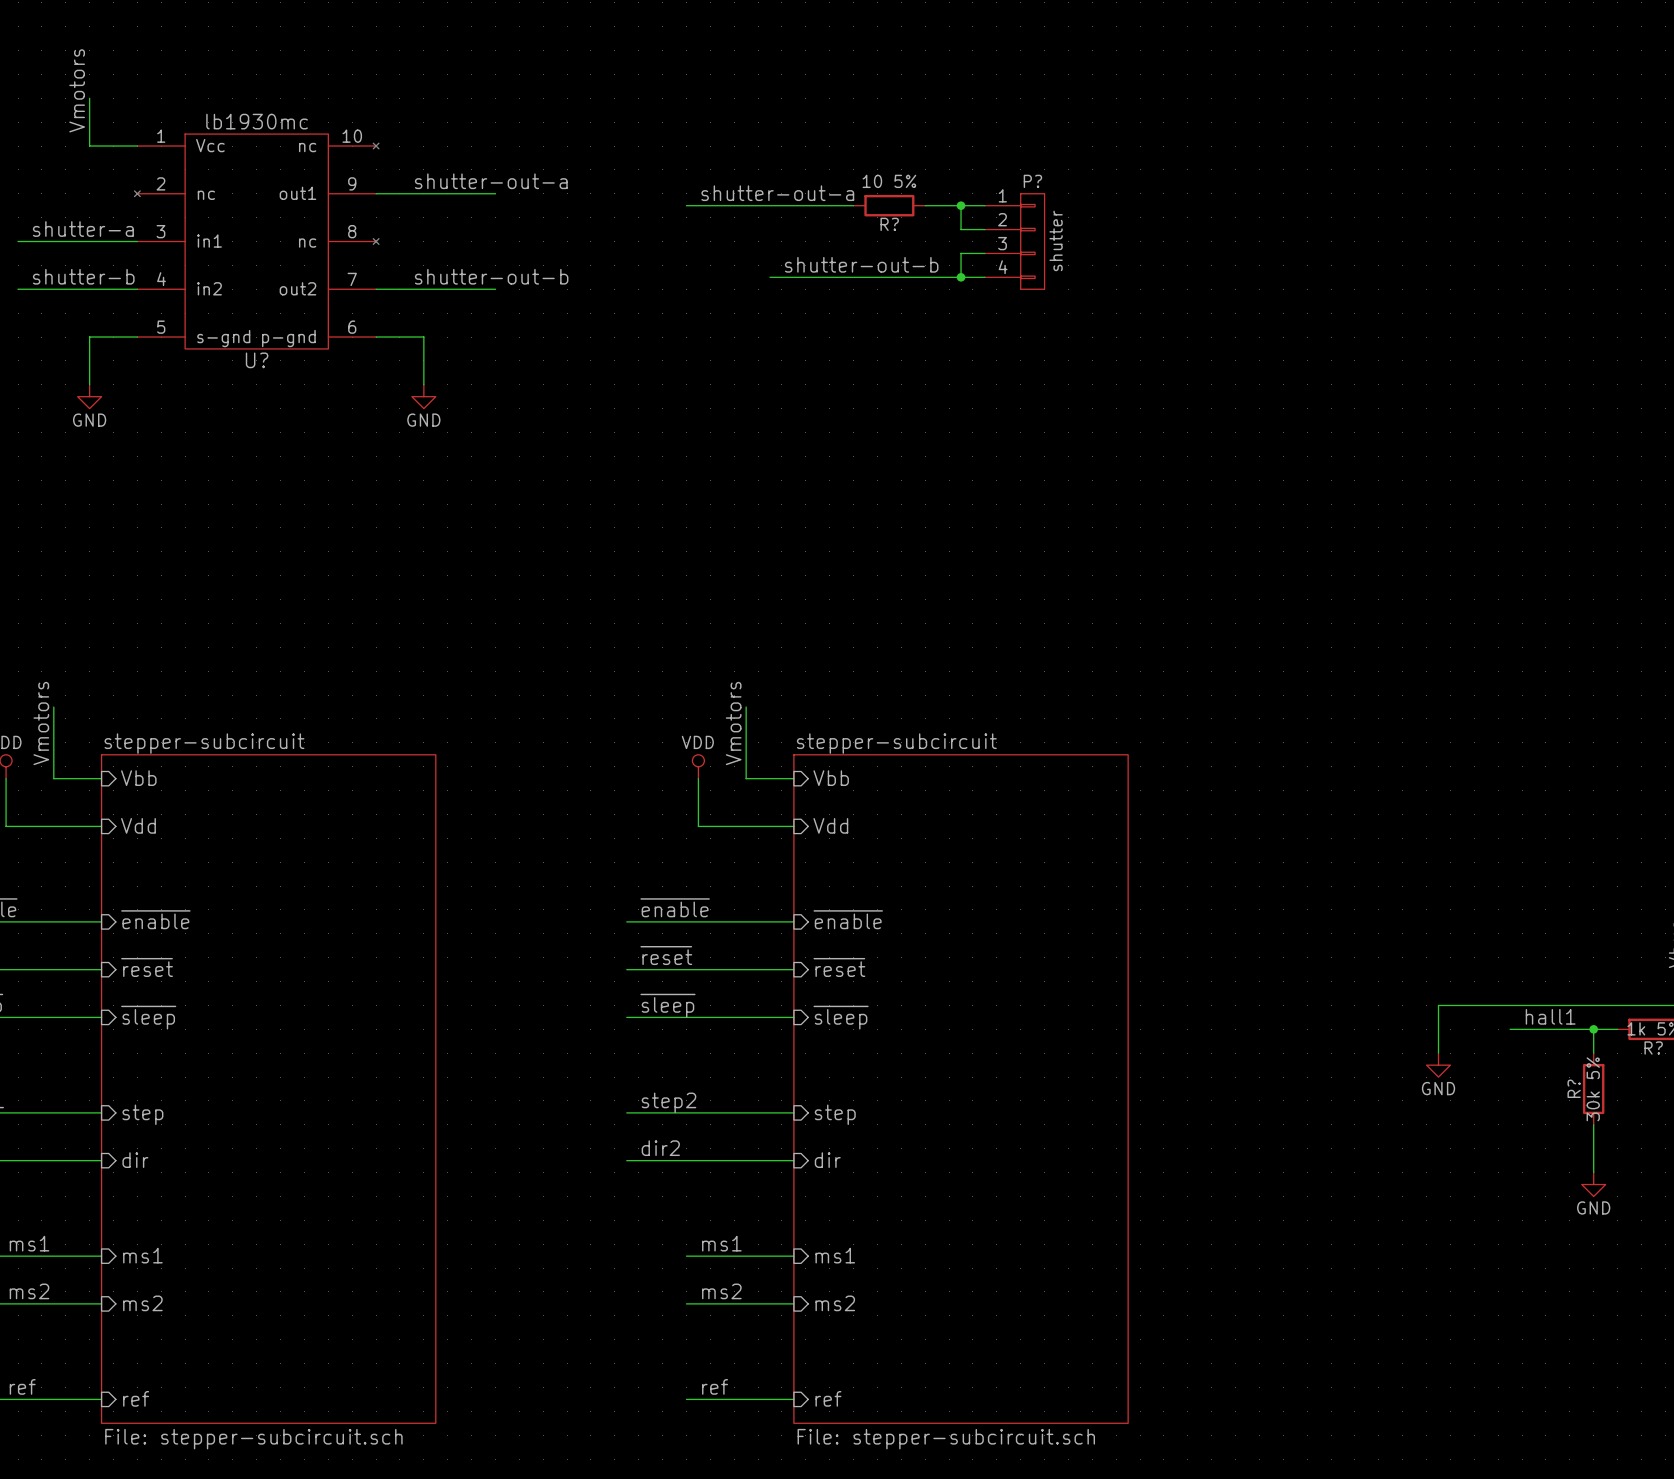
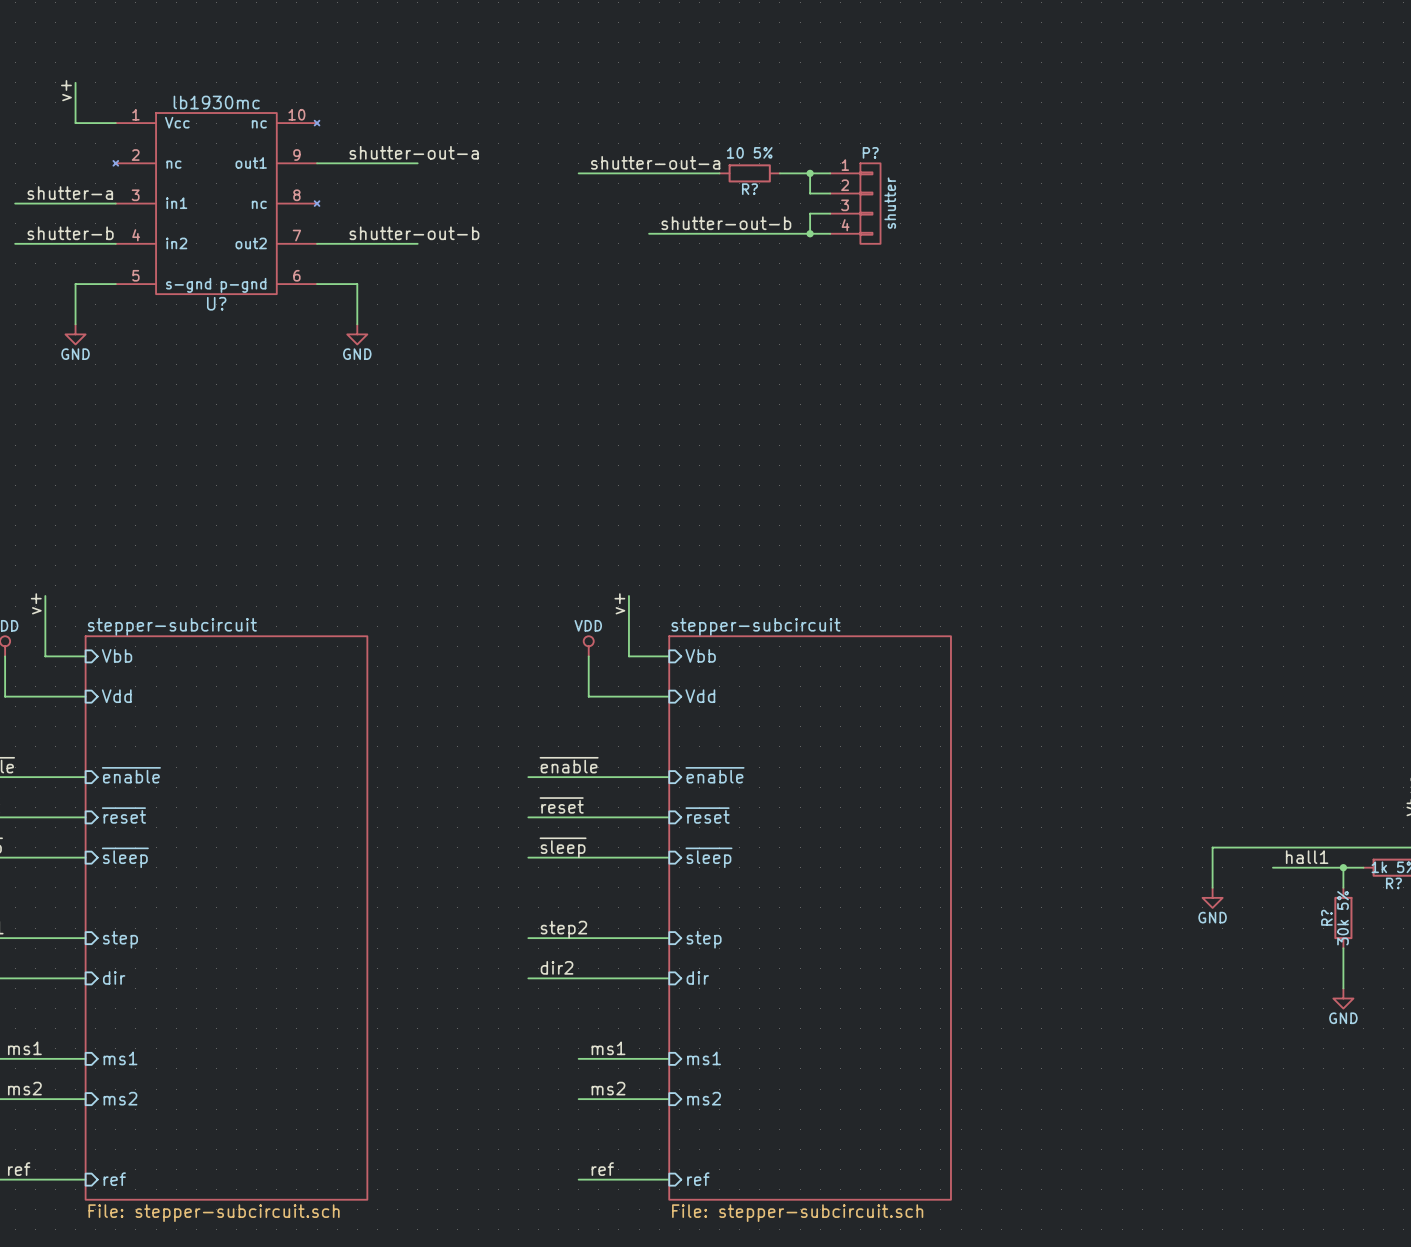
label: Vmotors (77, 90) -> none
label: none -> v+ (66, 90)
label: none -> v+ (36, 603)
label: none -> v+ (619, 603)
label: Vmotors (41, 723) -> none
label: Vmotors (733, 723) -> none

